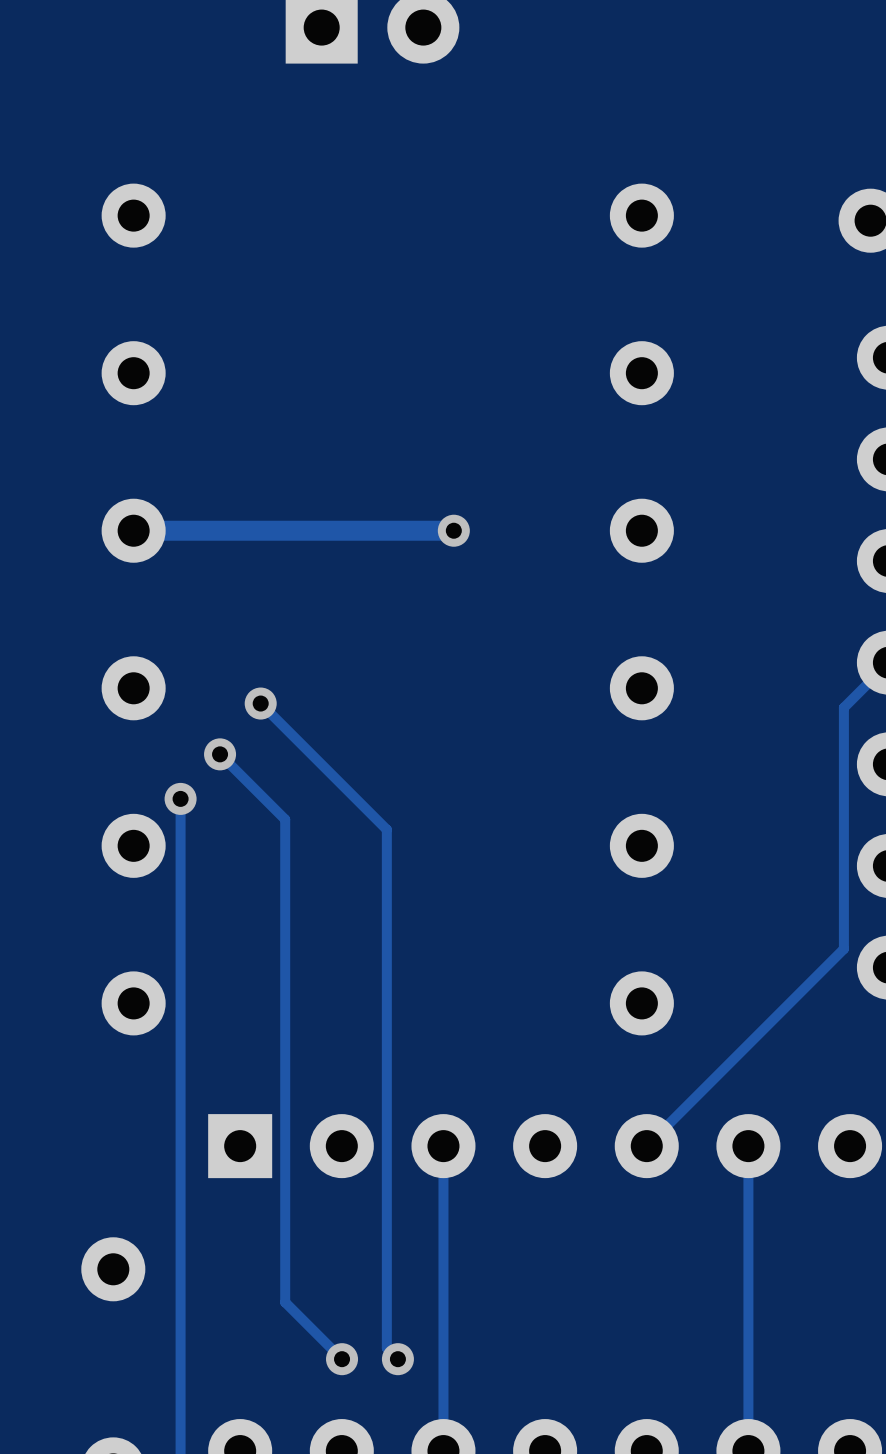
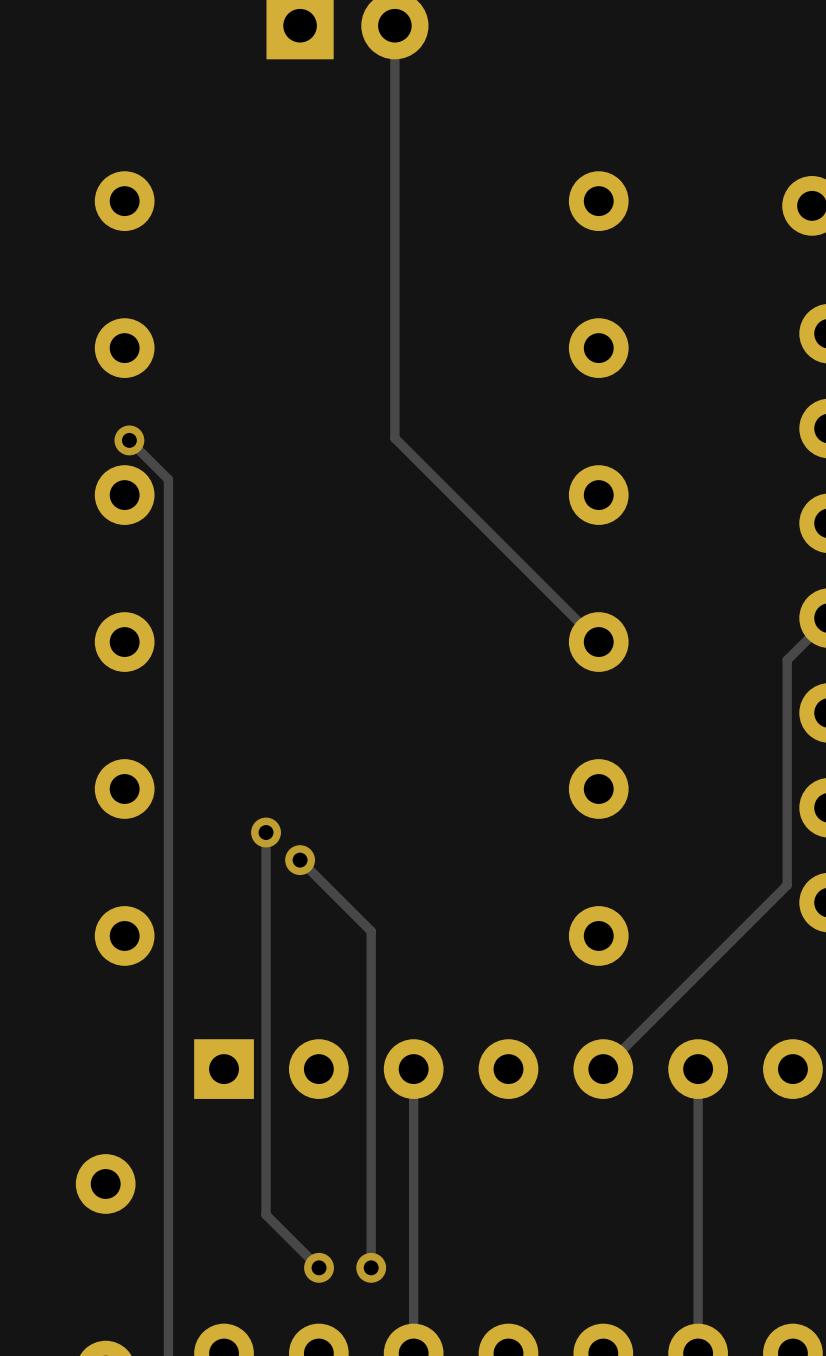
track: none -> (394, 25) (394, 438) (598, 642)
track: none -> (129, 440) (168, 479) (168, 745)
via: none -> (129, 440)
track: (453, 530) (133, 530) -> none
via: (453, 530) -> none
track: (260, 703) (386, 829) (386, 1348) (397, 1359) -> (300, 860) (371, 931) (371, 1267)
via: (260, 703) -> none
track: (220, 754) (285, 819) (285, 892) -> none
via: (220, 754) -> none
via: (180, 798) -> none
via: none -> (266, 832)
via: none -> (300, 860)

